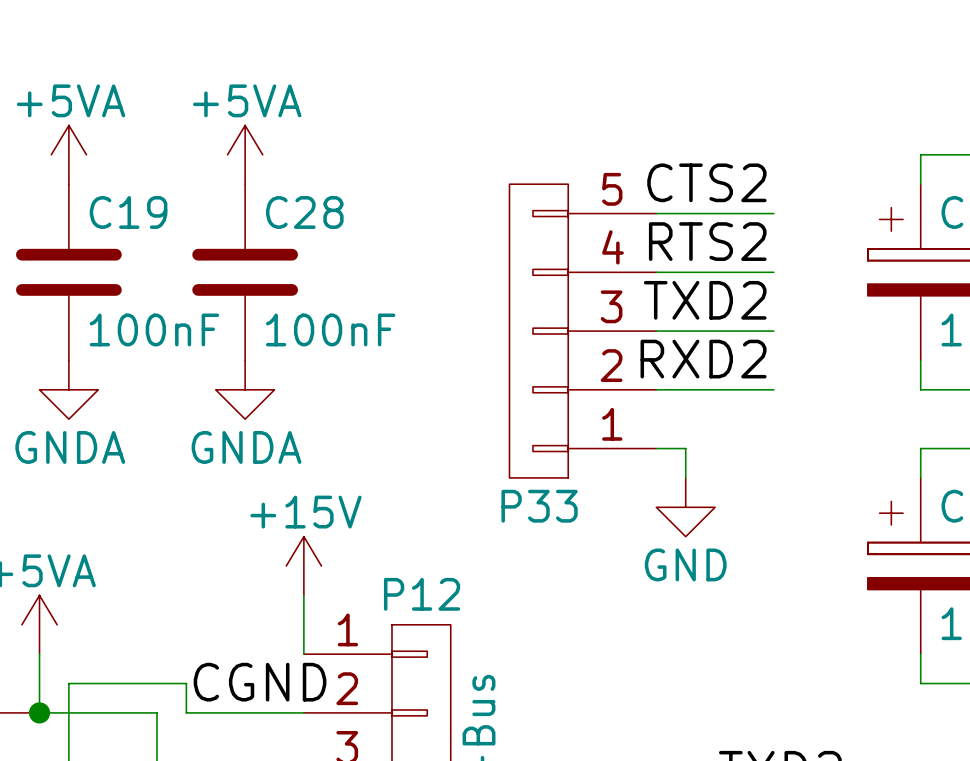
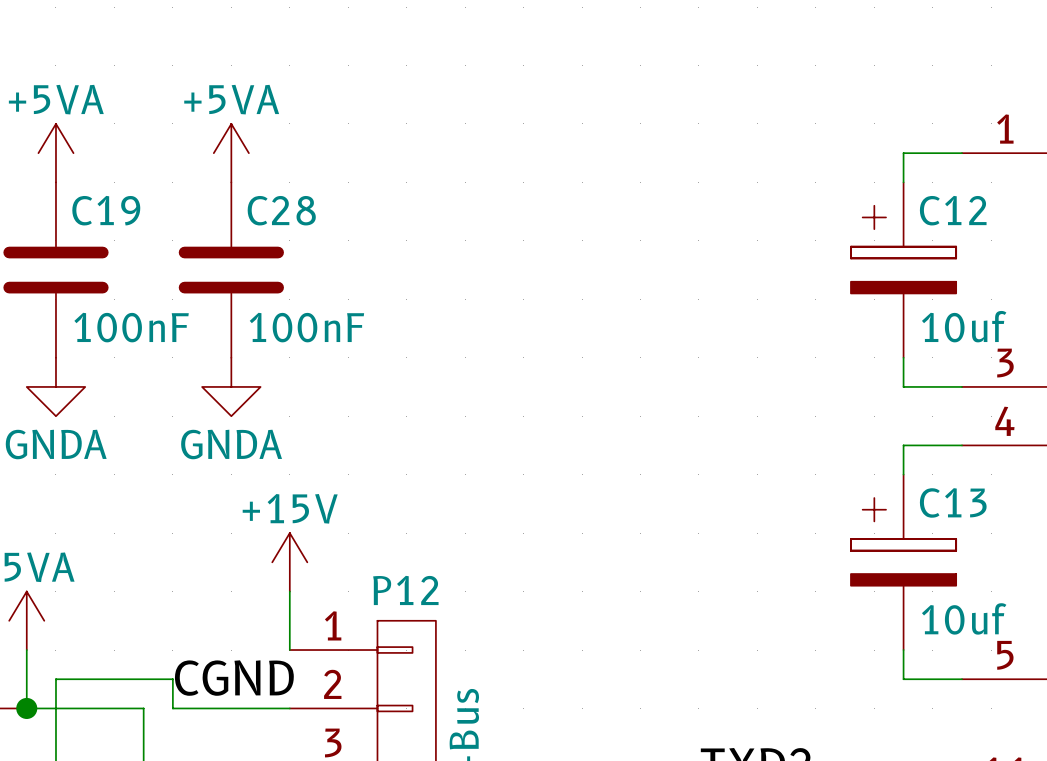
label: CTS2 (706, 182) -> none
wire: (656, 213) (773, 213) -> none
label: RTS2 (707, 241) -> none
wire: (656, 272) (773, 272) -> none
label: TXD2 (705, 300) -> none
P33: (582, 331) -> none
wire: (656, 331) (773, 331) -> none
label: RXD2 (703, 359) -> none
wire: (656, 389) (773, 389) -> none
wire: (656, 448) (685, 448) (685, 477) -> none
power symbol: GND (685, 507) -> none

